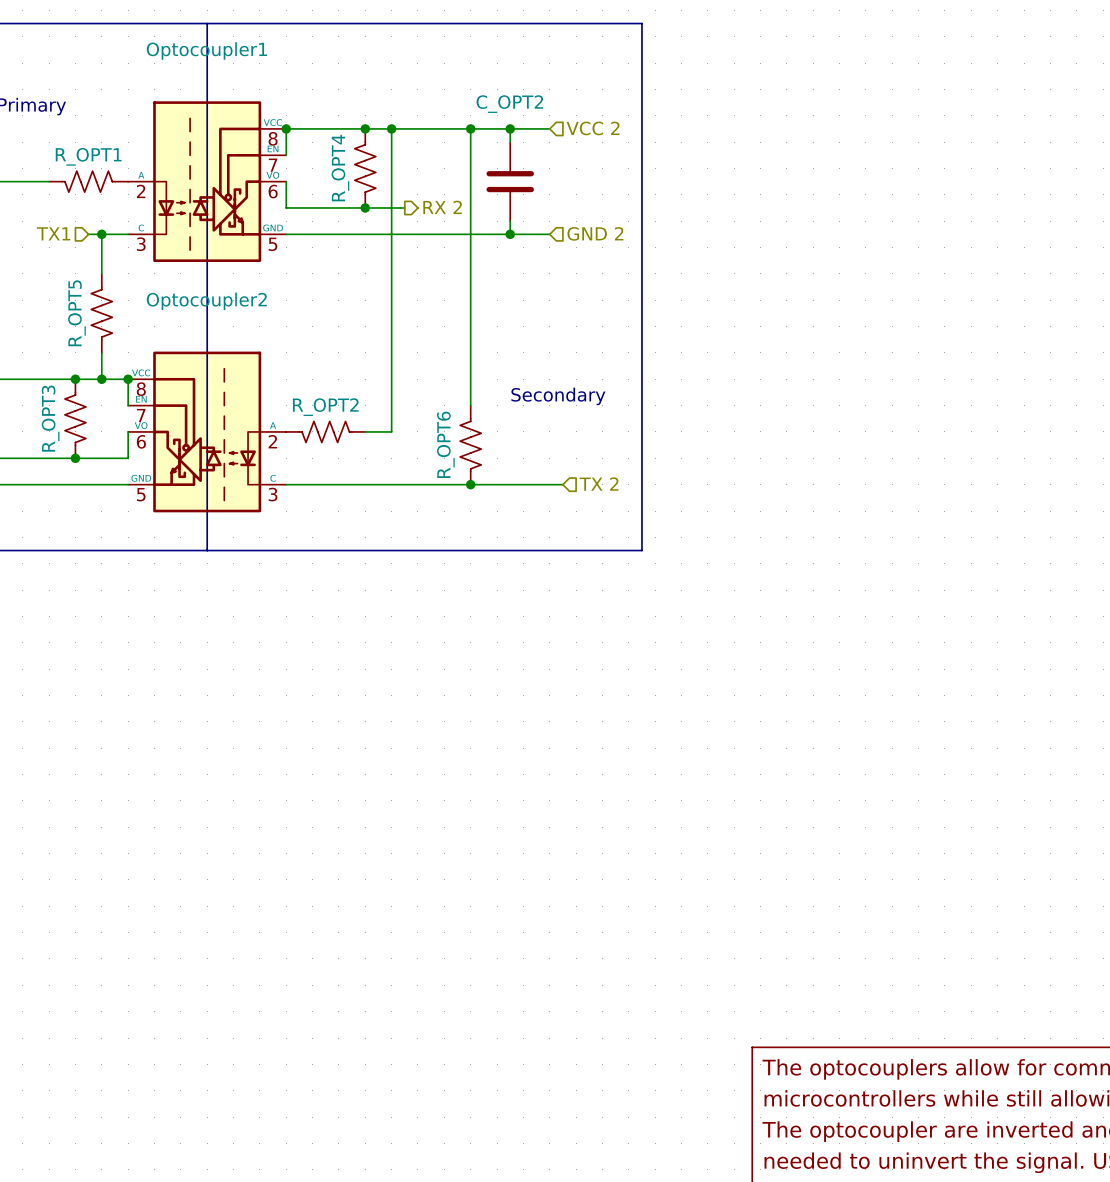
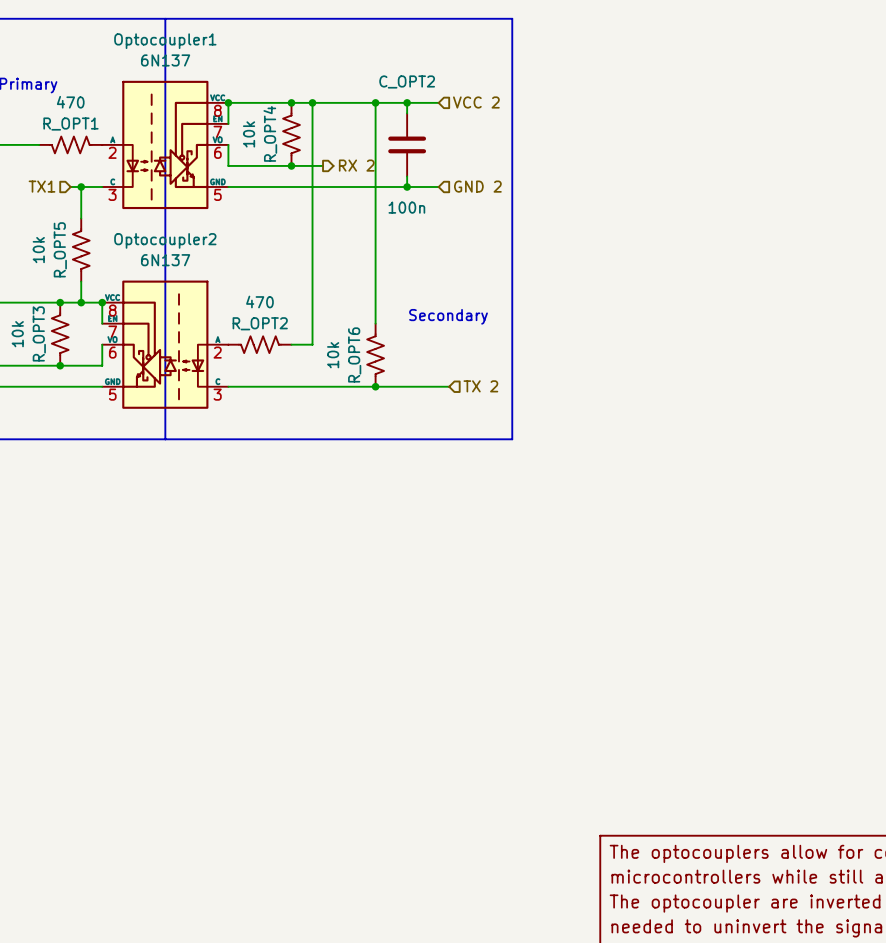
Optocoupler1 value: none -> 6N137 (165, 60)
R_OPT1 value: none -> 470 (70, 102)
R_OPT4 value: none -> 10k (249, 134)
C_OPT2 value: none -> 100n (406, 207)
R_OPT5 value: none -> 10k (38, 250)
Optocoupler2 value: none -> 6N137 (165, 260)
R_OPT2 value: none -> 470 (259, 301)
R_OPT3 value: none -> 10k (17, 334)
R_OPT6 value: none -> 10k (333, 355)

